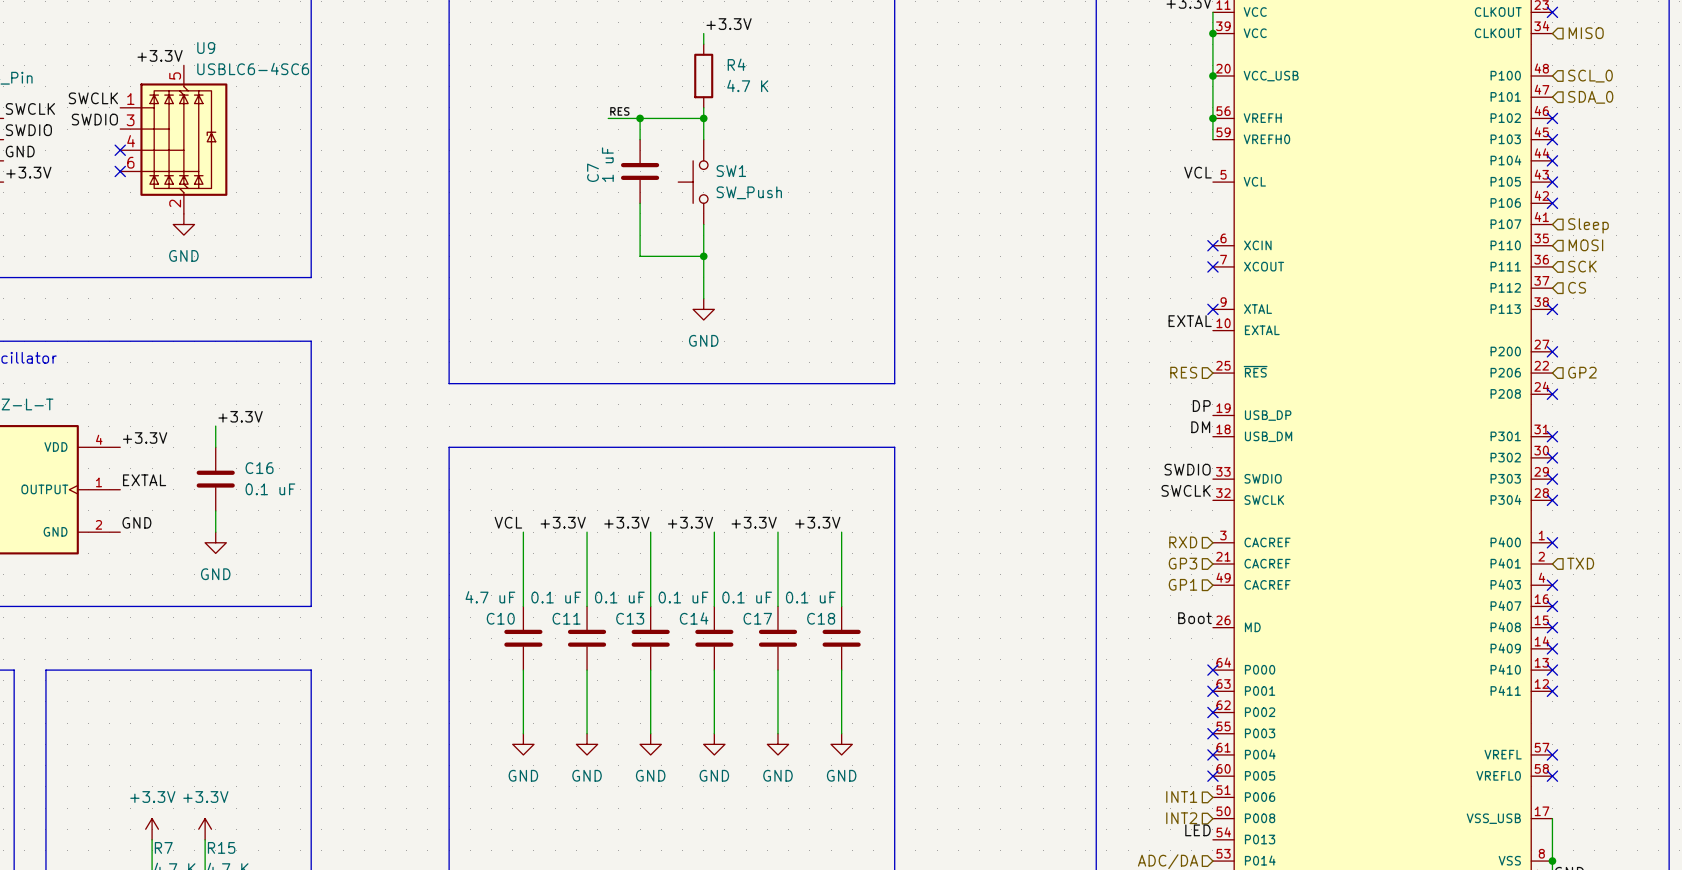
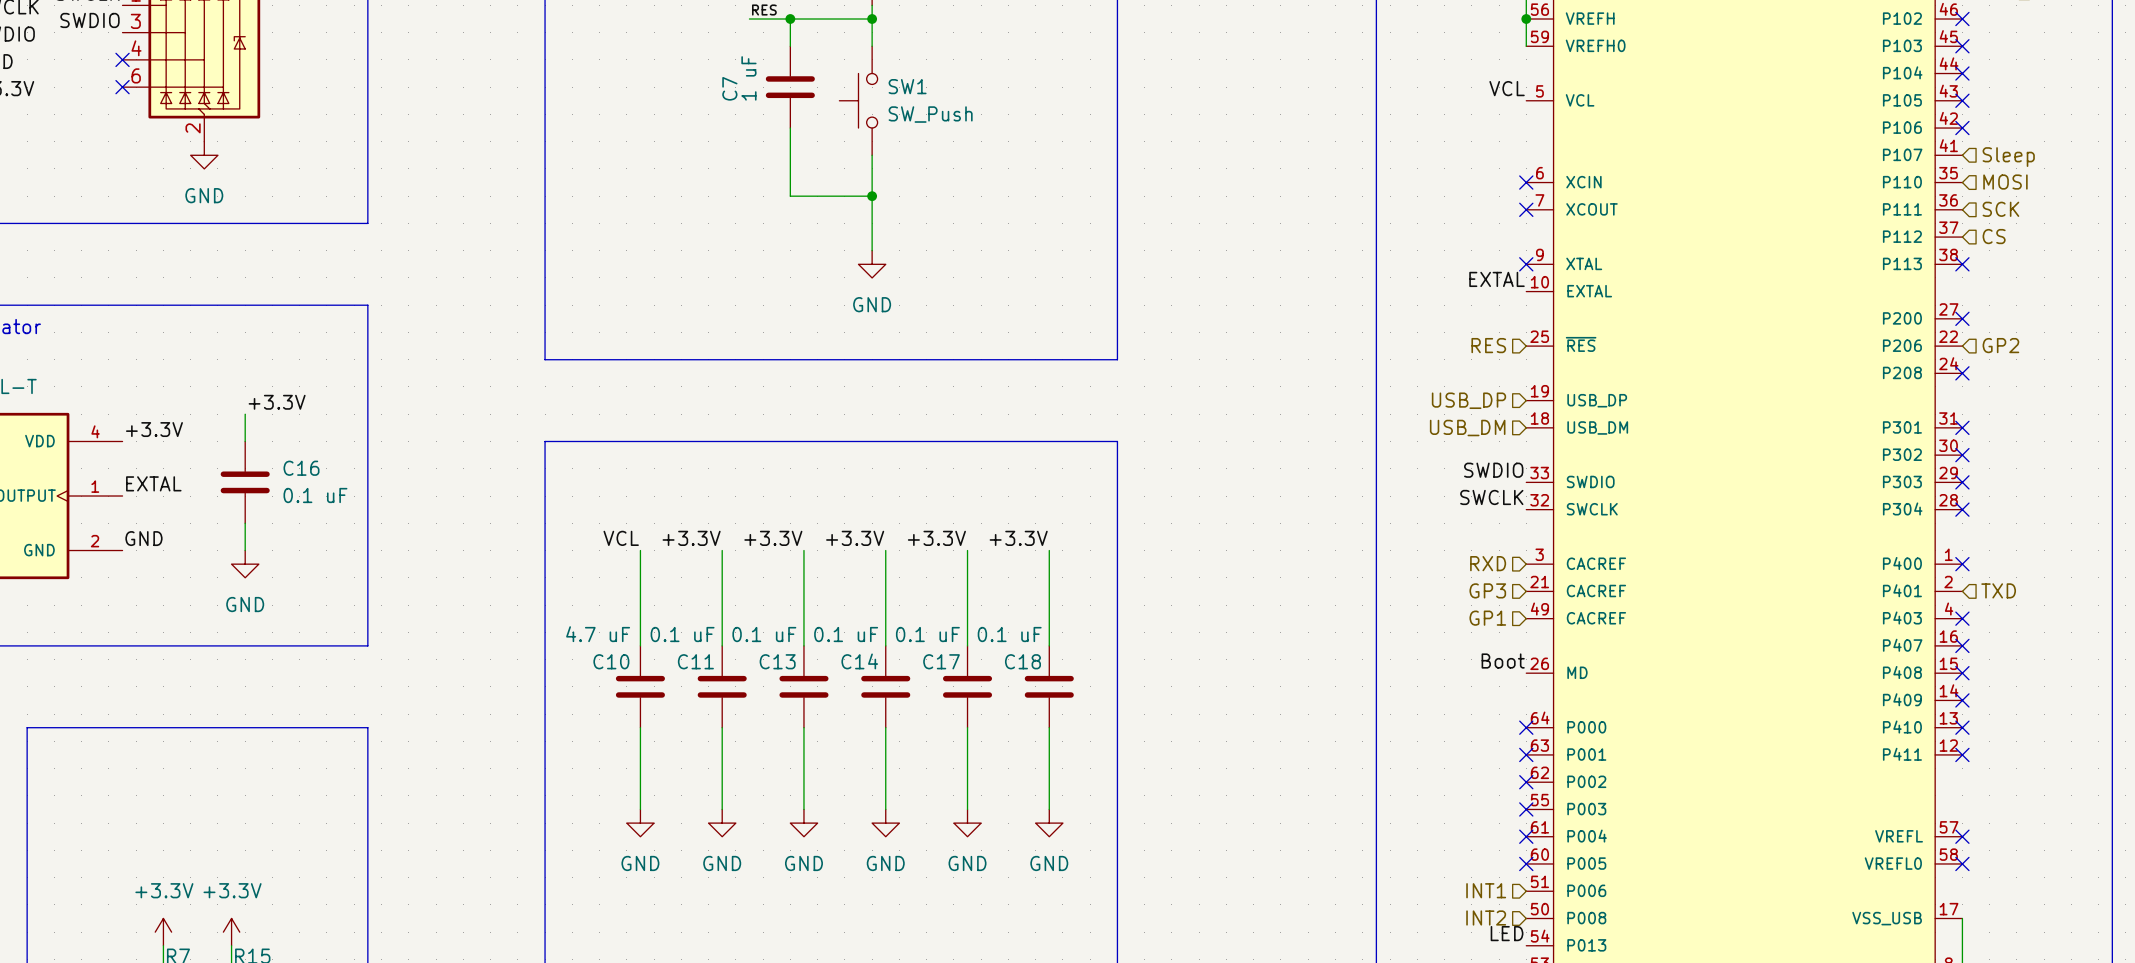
label: DP (1201, 406) -> none
hierarchical label: none -> USB_DP (1468, 400)
label: DM (1200, 427) -> none
hierarchical label: none -> USB_DM (1467, 428)

